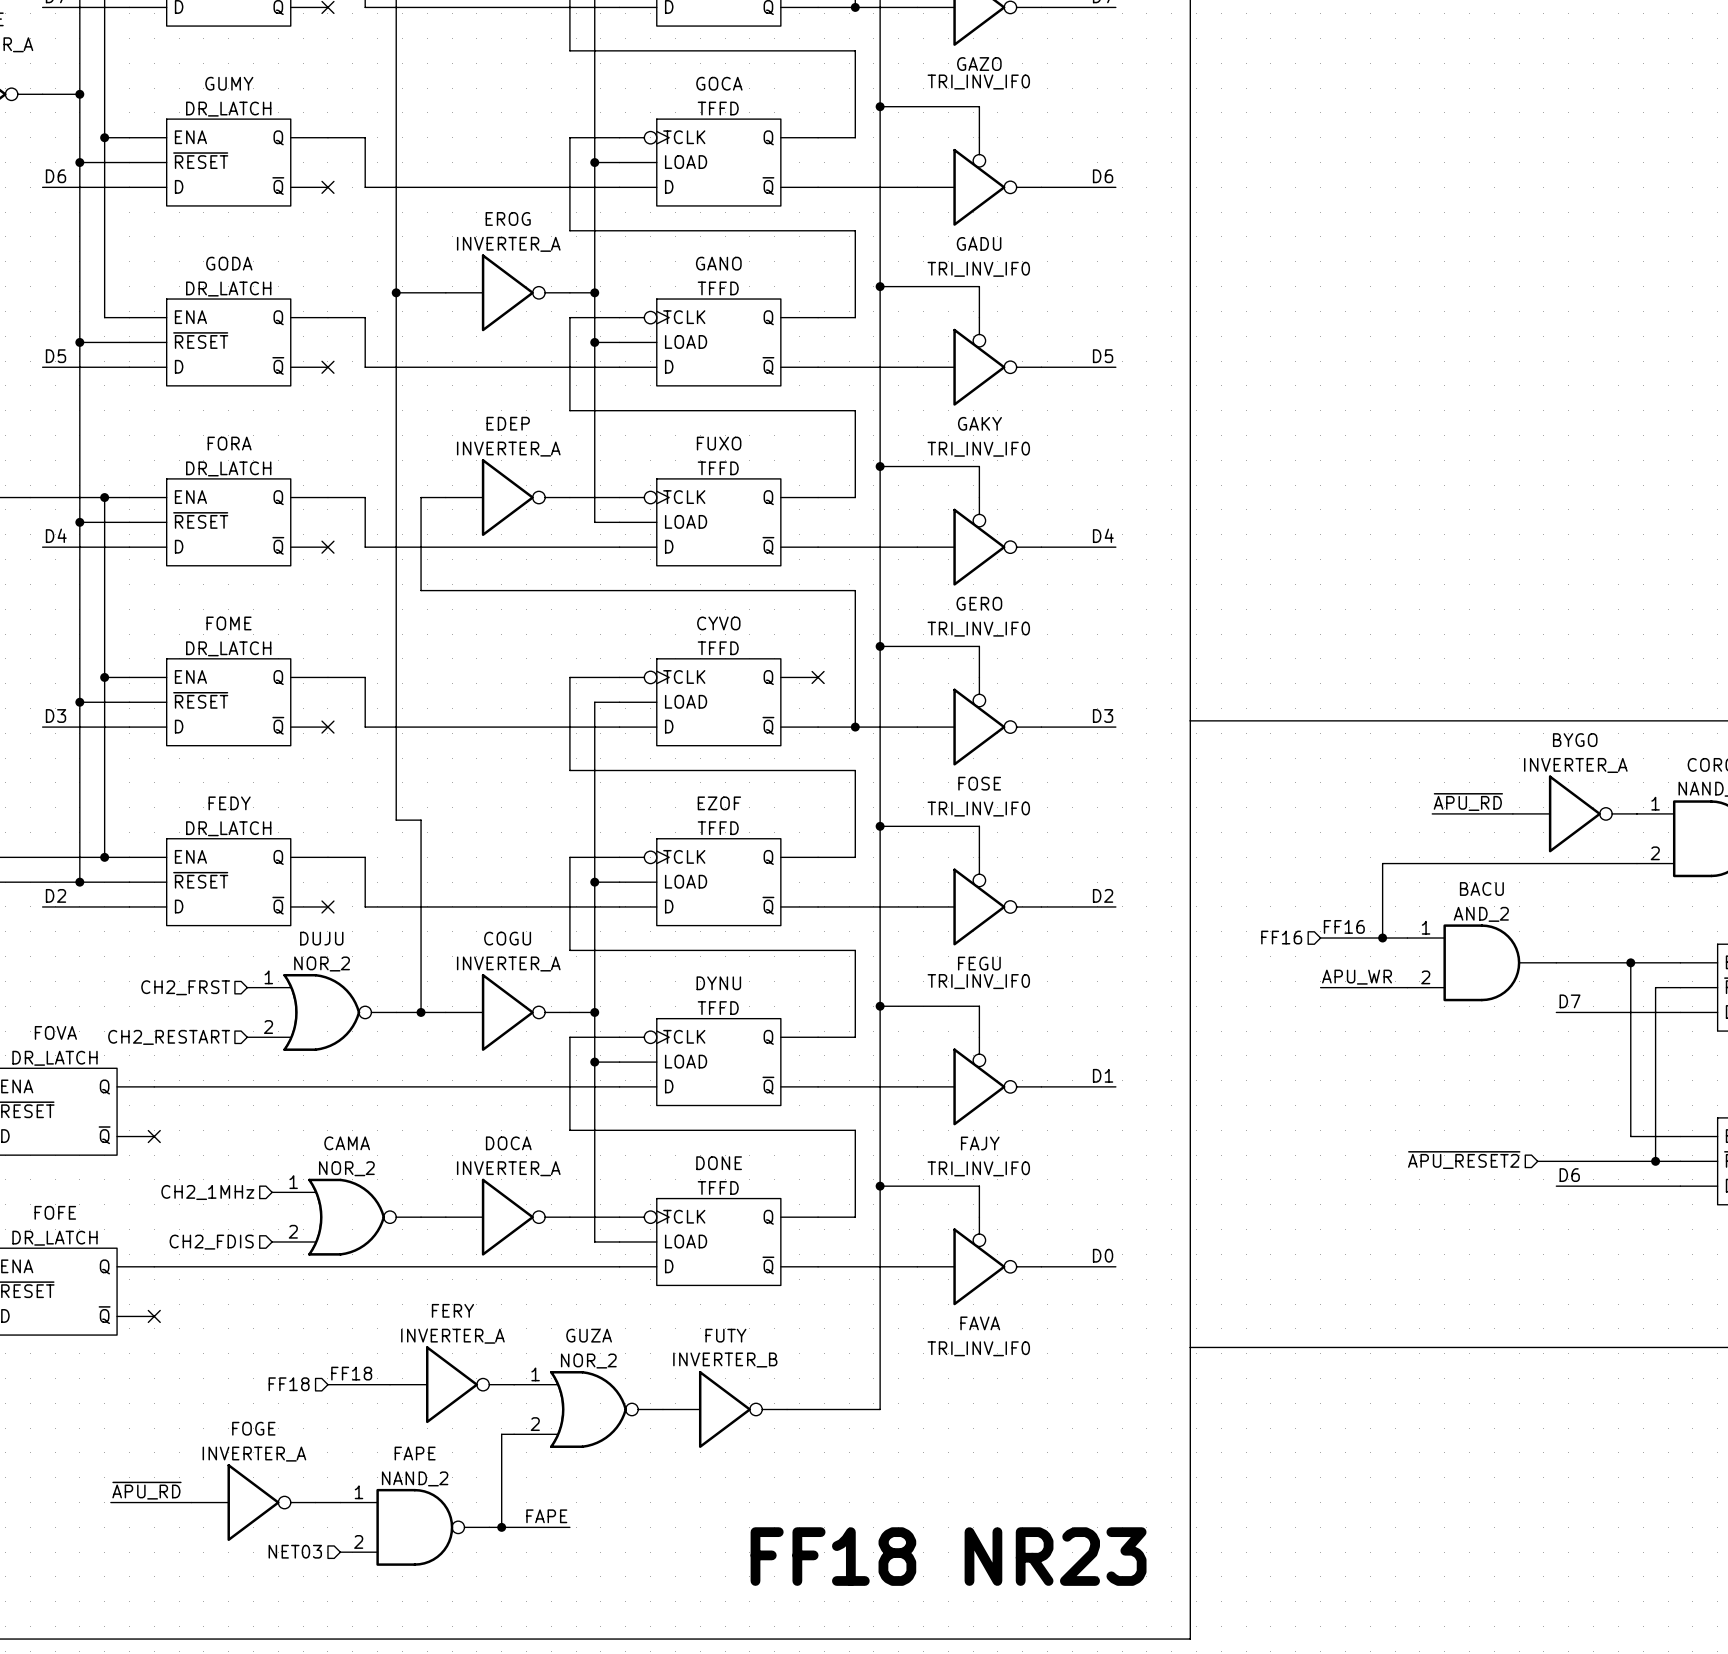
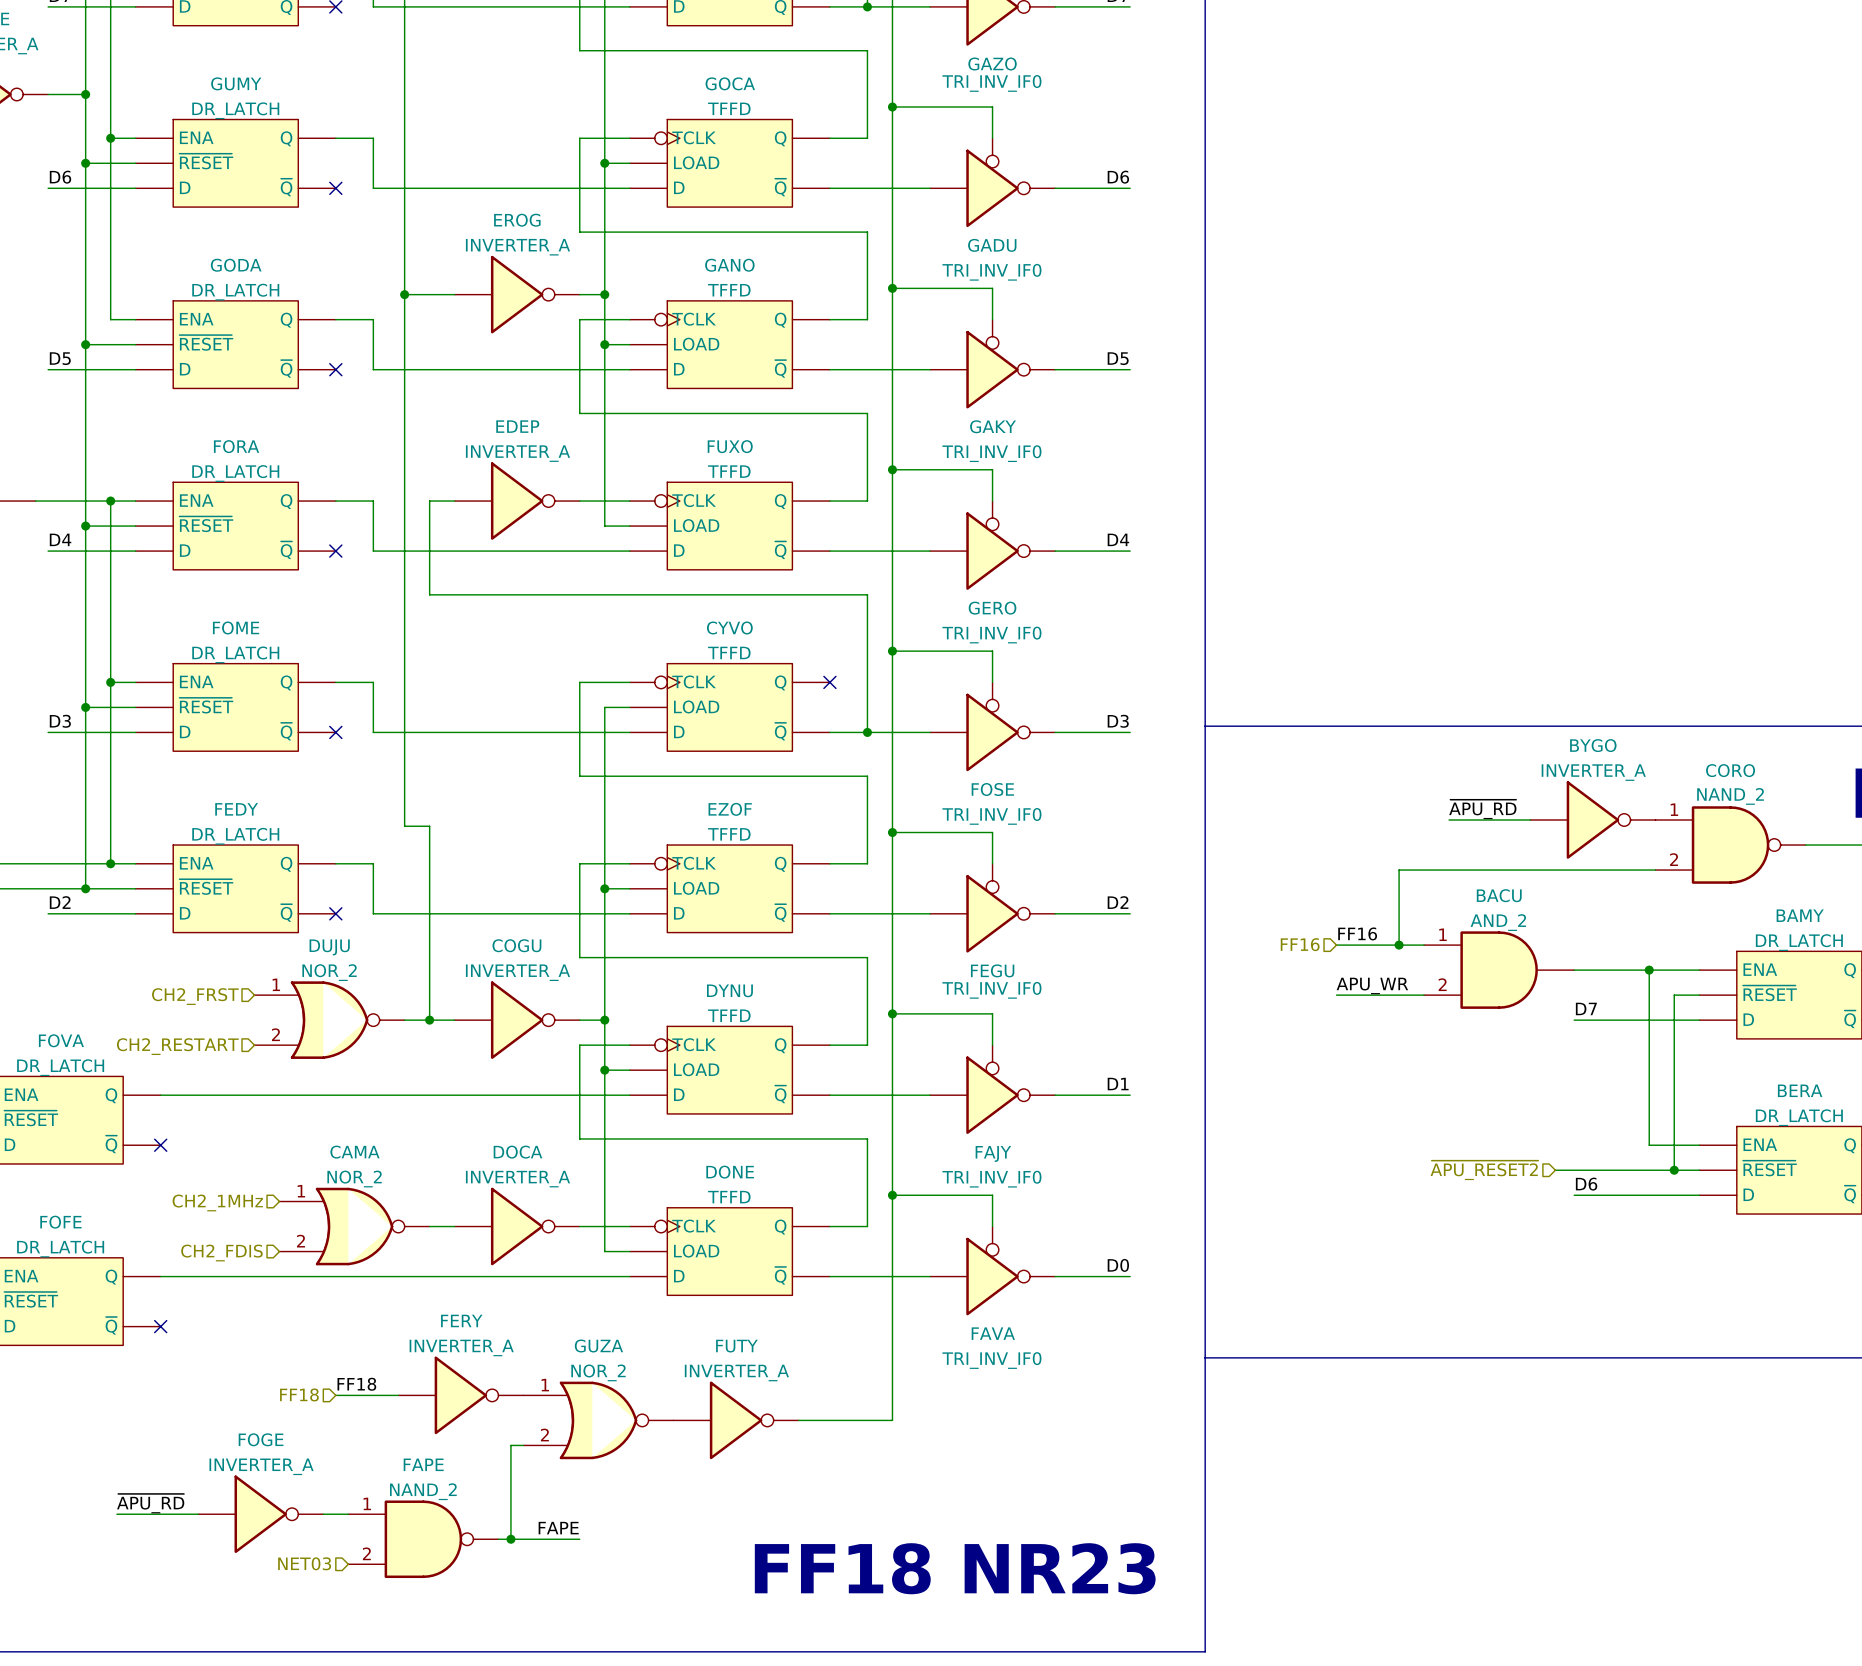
FUTY value: INVERTER_B (725, 1359) -> INVERTER_A (736, 1372)

